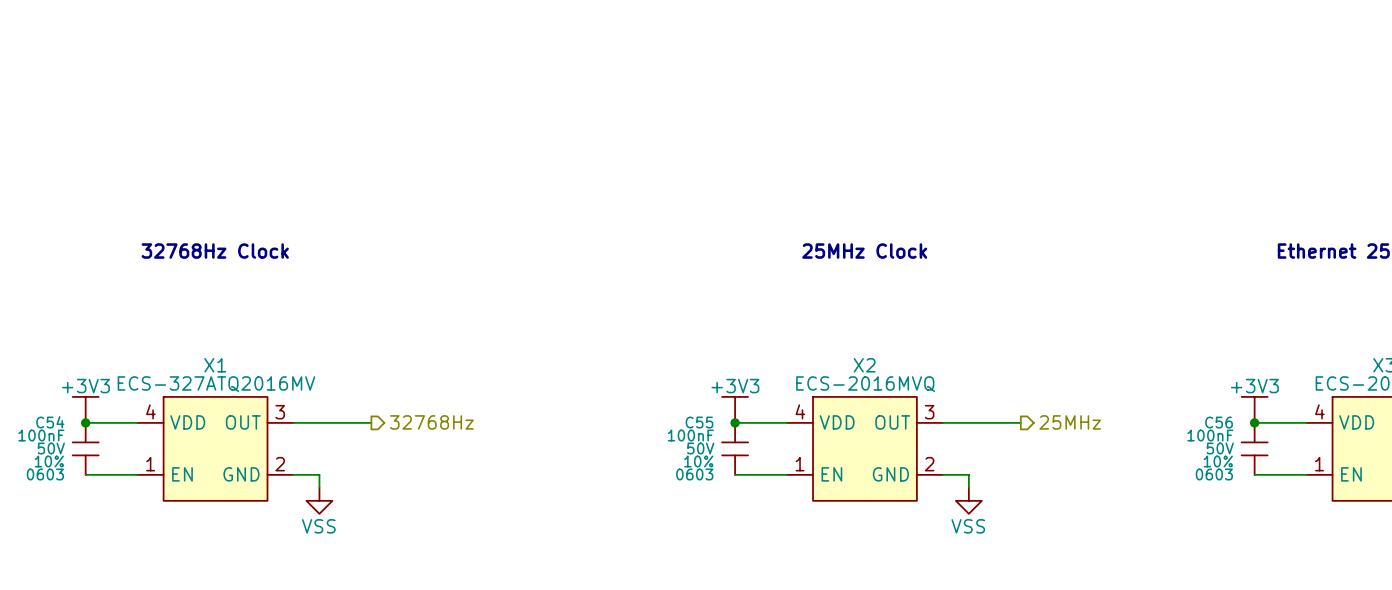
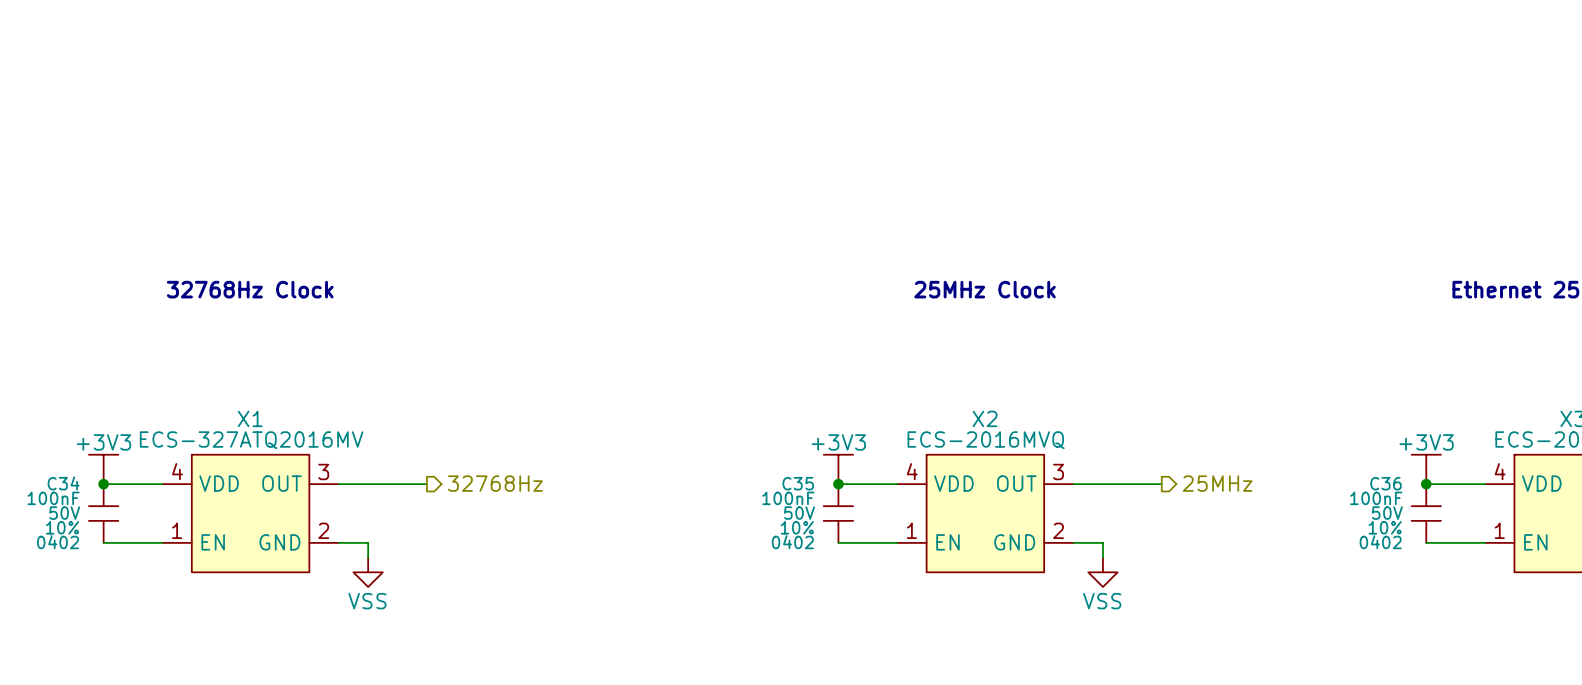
C54 name: C54 (50, 422) -> C34 (63, 483)
C55 name: C55 (699, 422) -> C35 (798, 483)
C56 name: C56 (1219, 422) -> C36 (1386, 483)
C54 text: 0603 (45, 474) -> 0402 (58, 542)
C55 text: 0603 (694, 474) -> 0402 (792, 542)
C56 text: 0603 (1214, 474) -> 0402 (1380, 542)

